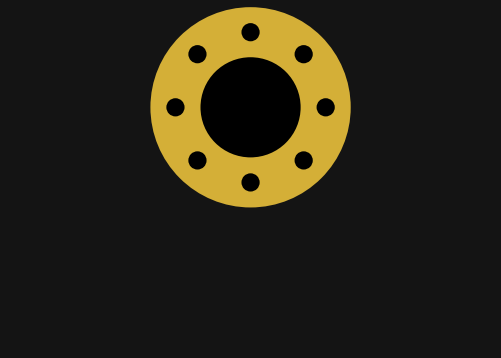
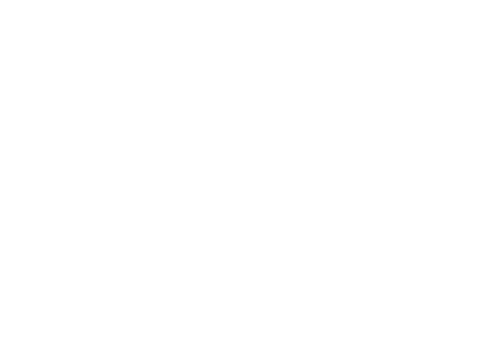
part: (250, 107) -> none

